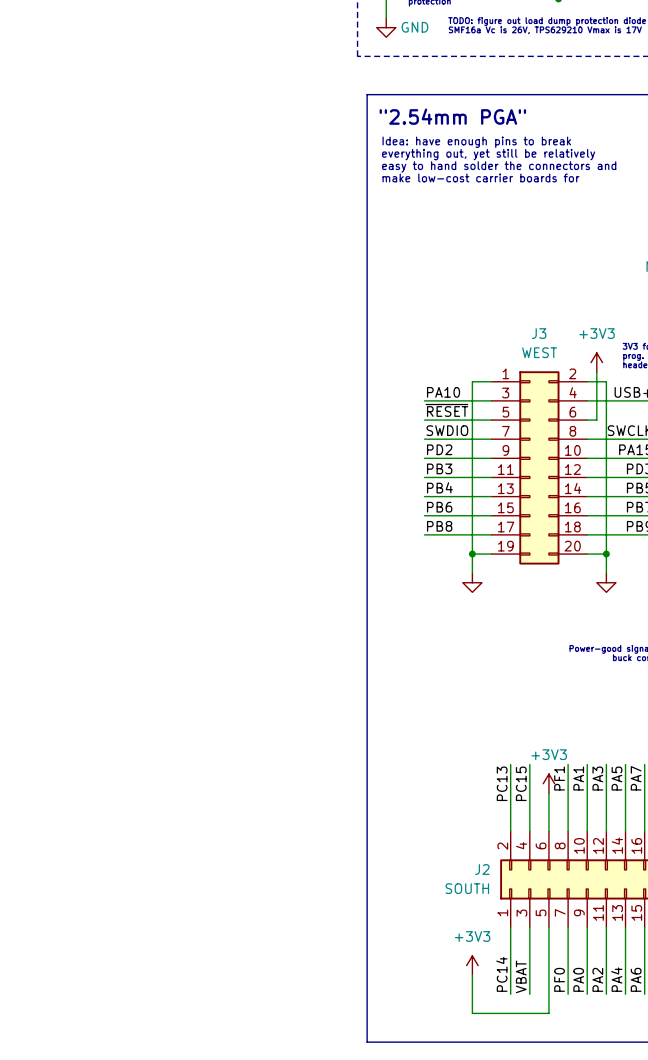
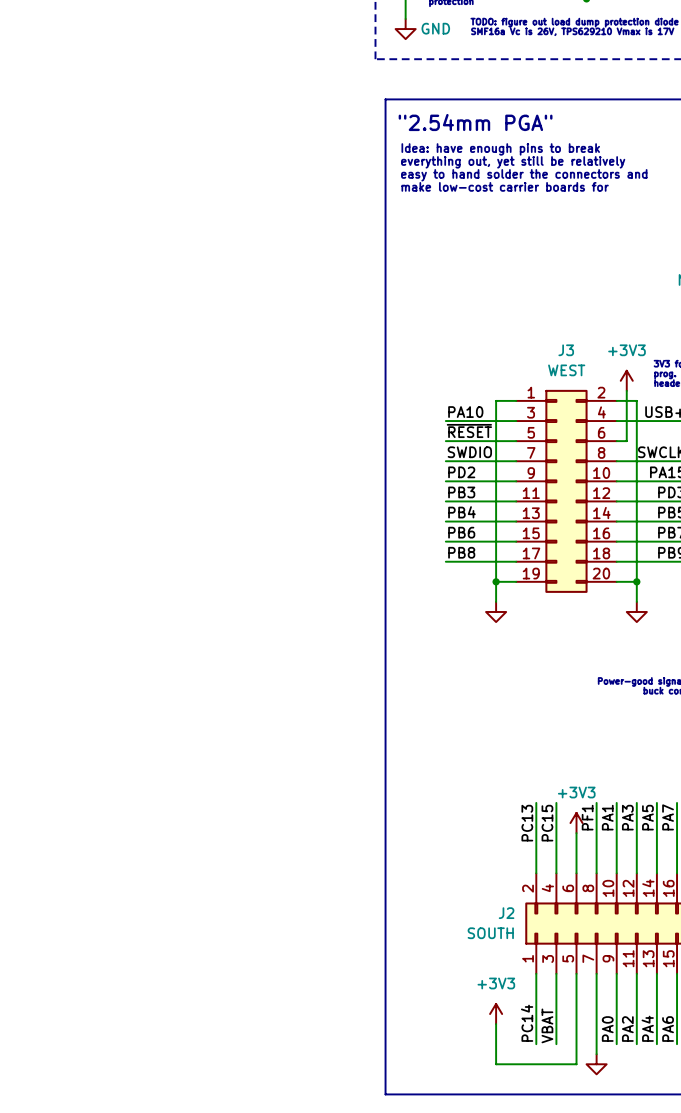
label: PF0 (559, 979) -> none
wire: none -> (596, 1044) (596, 1054)
power symbol: none -> (596, 1064)

